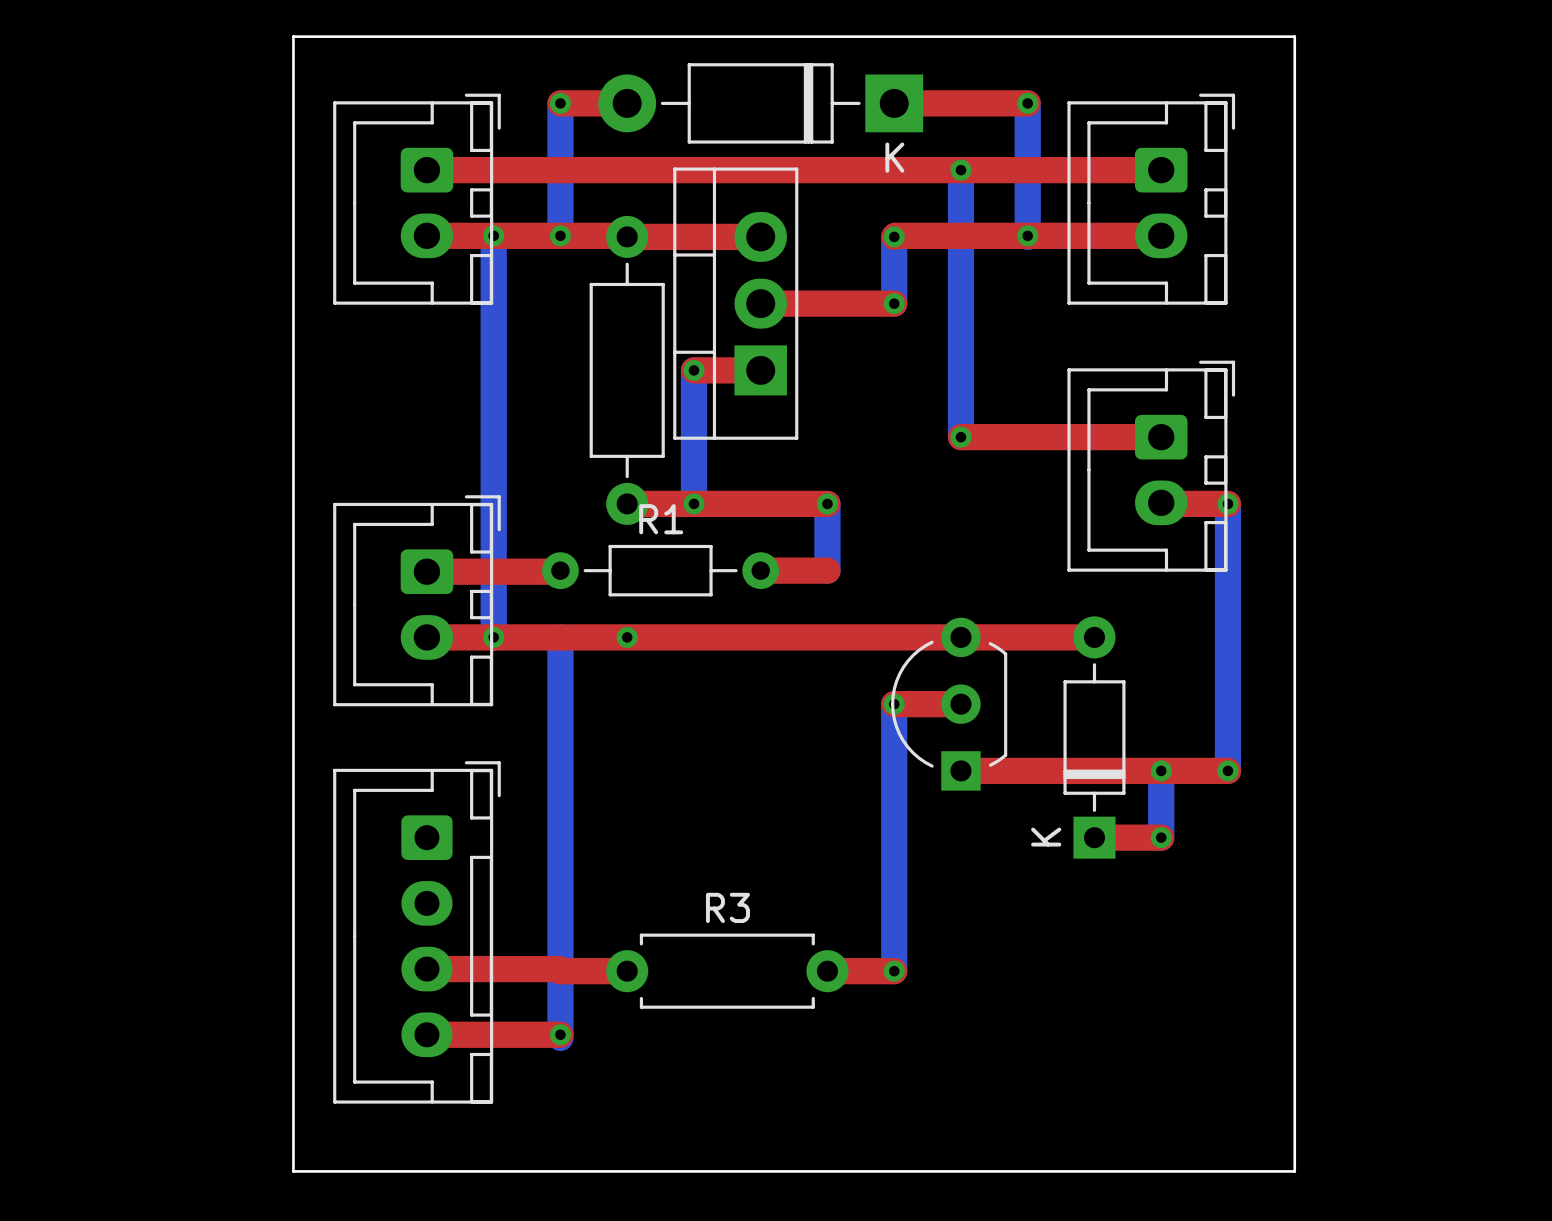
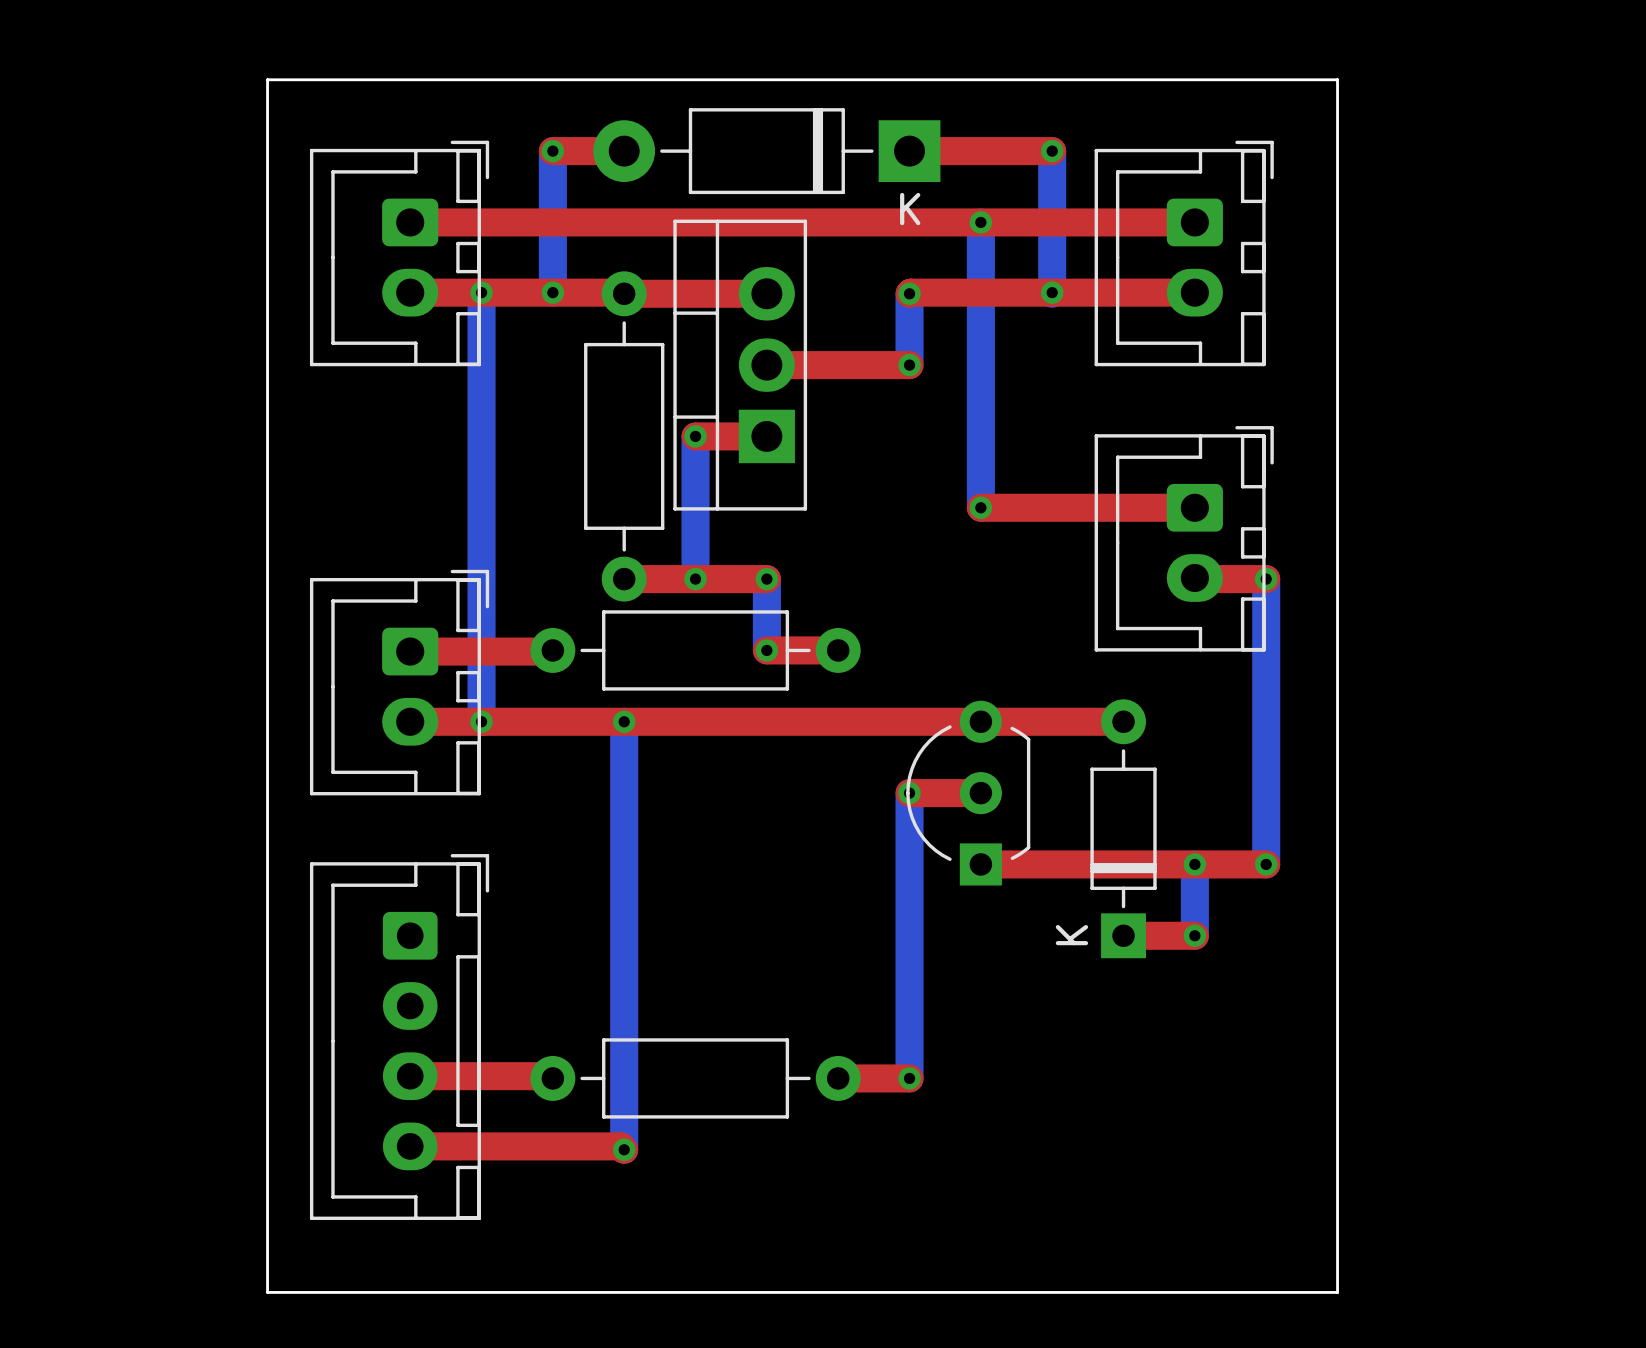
top track: (760, 503) (827, 503) -> none
bottom track: (827, 503) (827, 570) -> (766, 579) (766, 650)
via position: (827, 503) -> (766, 579)
R1: (660, 570) -> none
part: none -> (695, 650)
bottom track: (560, 637) (560, 1037) -> (624, 721) (624, 1149)
top track: (560, 971) (627, 971) -> none
part: none -> (695, 1078)
R3: (727, 971) -> none
top track: none -> (552, 1146) (620, 1146) (624, 1149)
via position: (560, 1034) -> (624, 1149)

